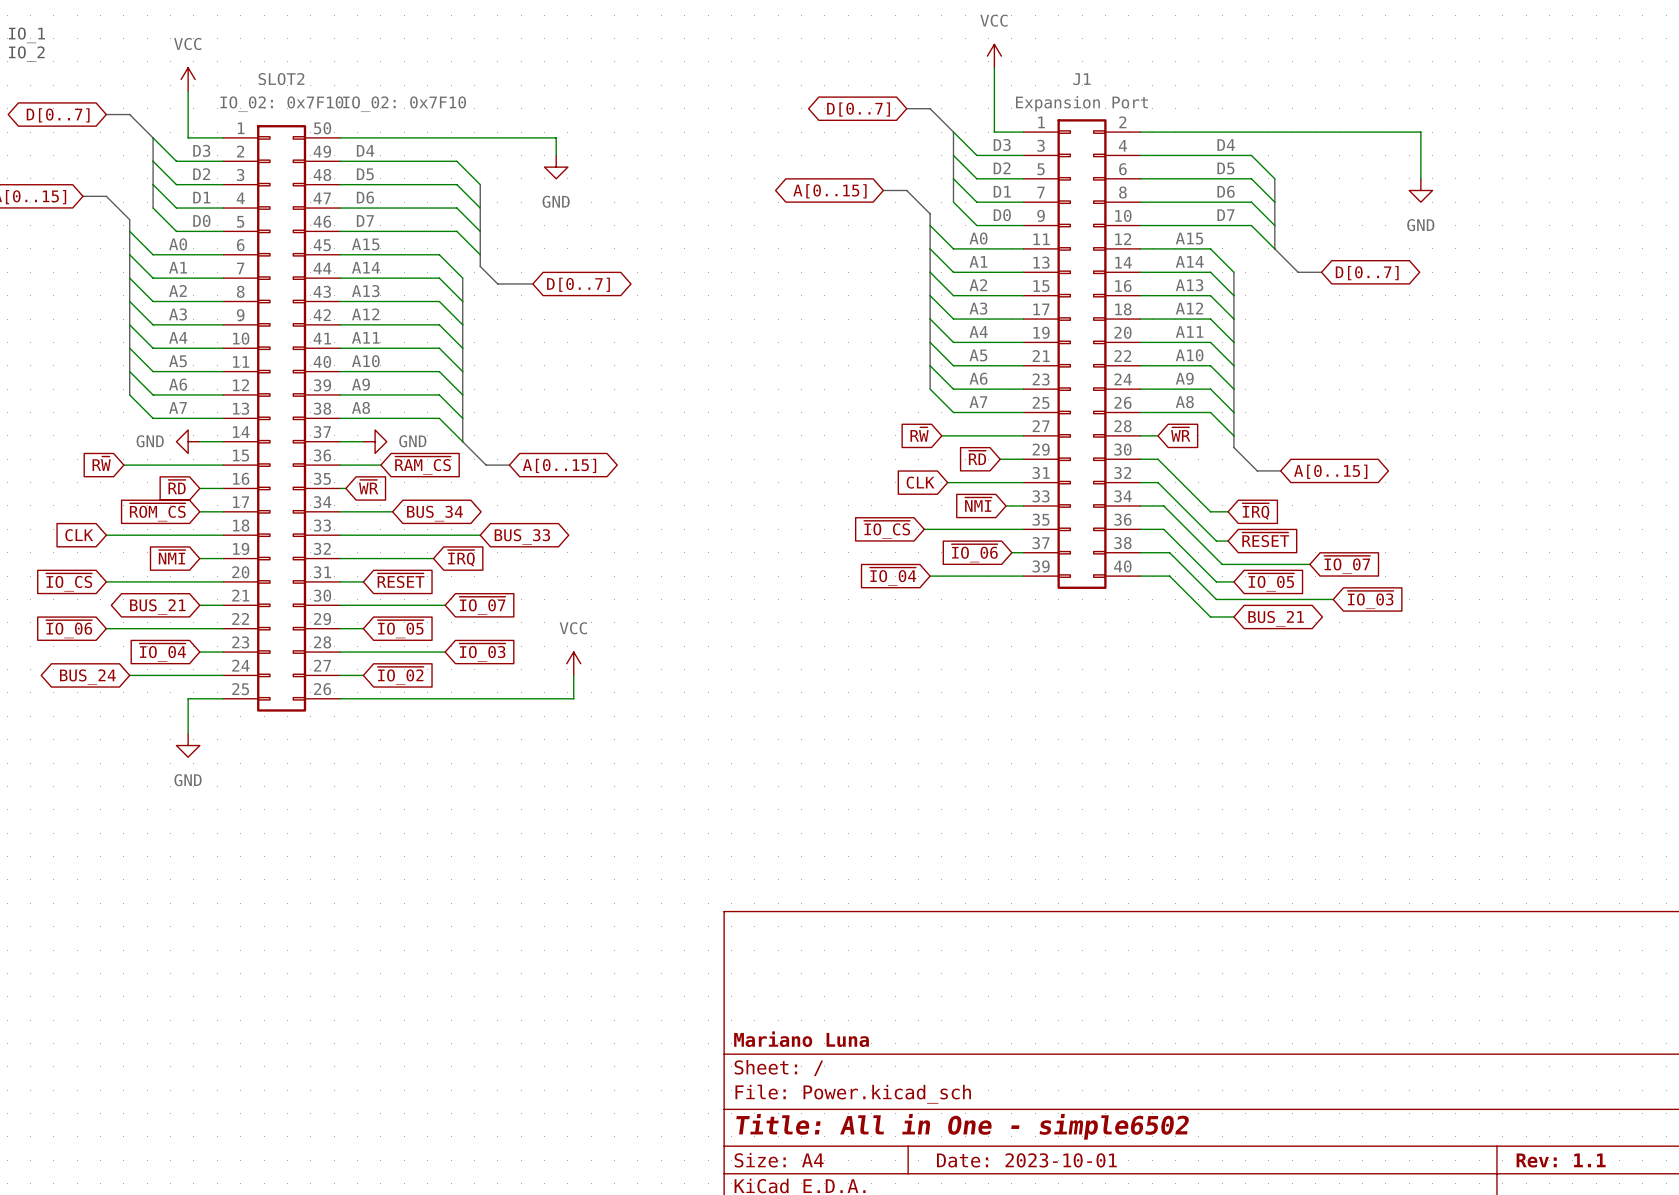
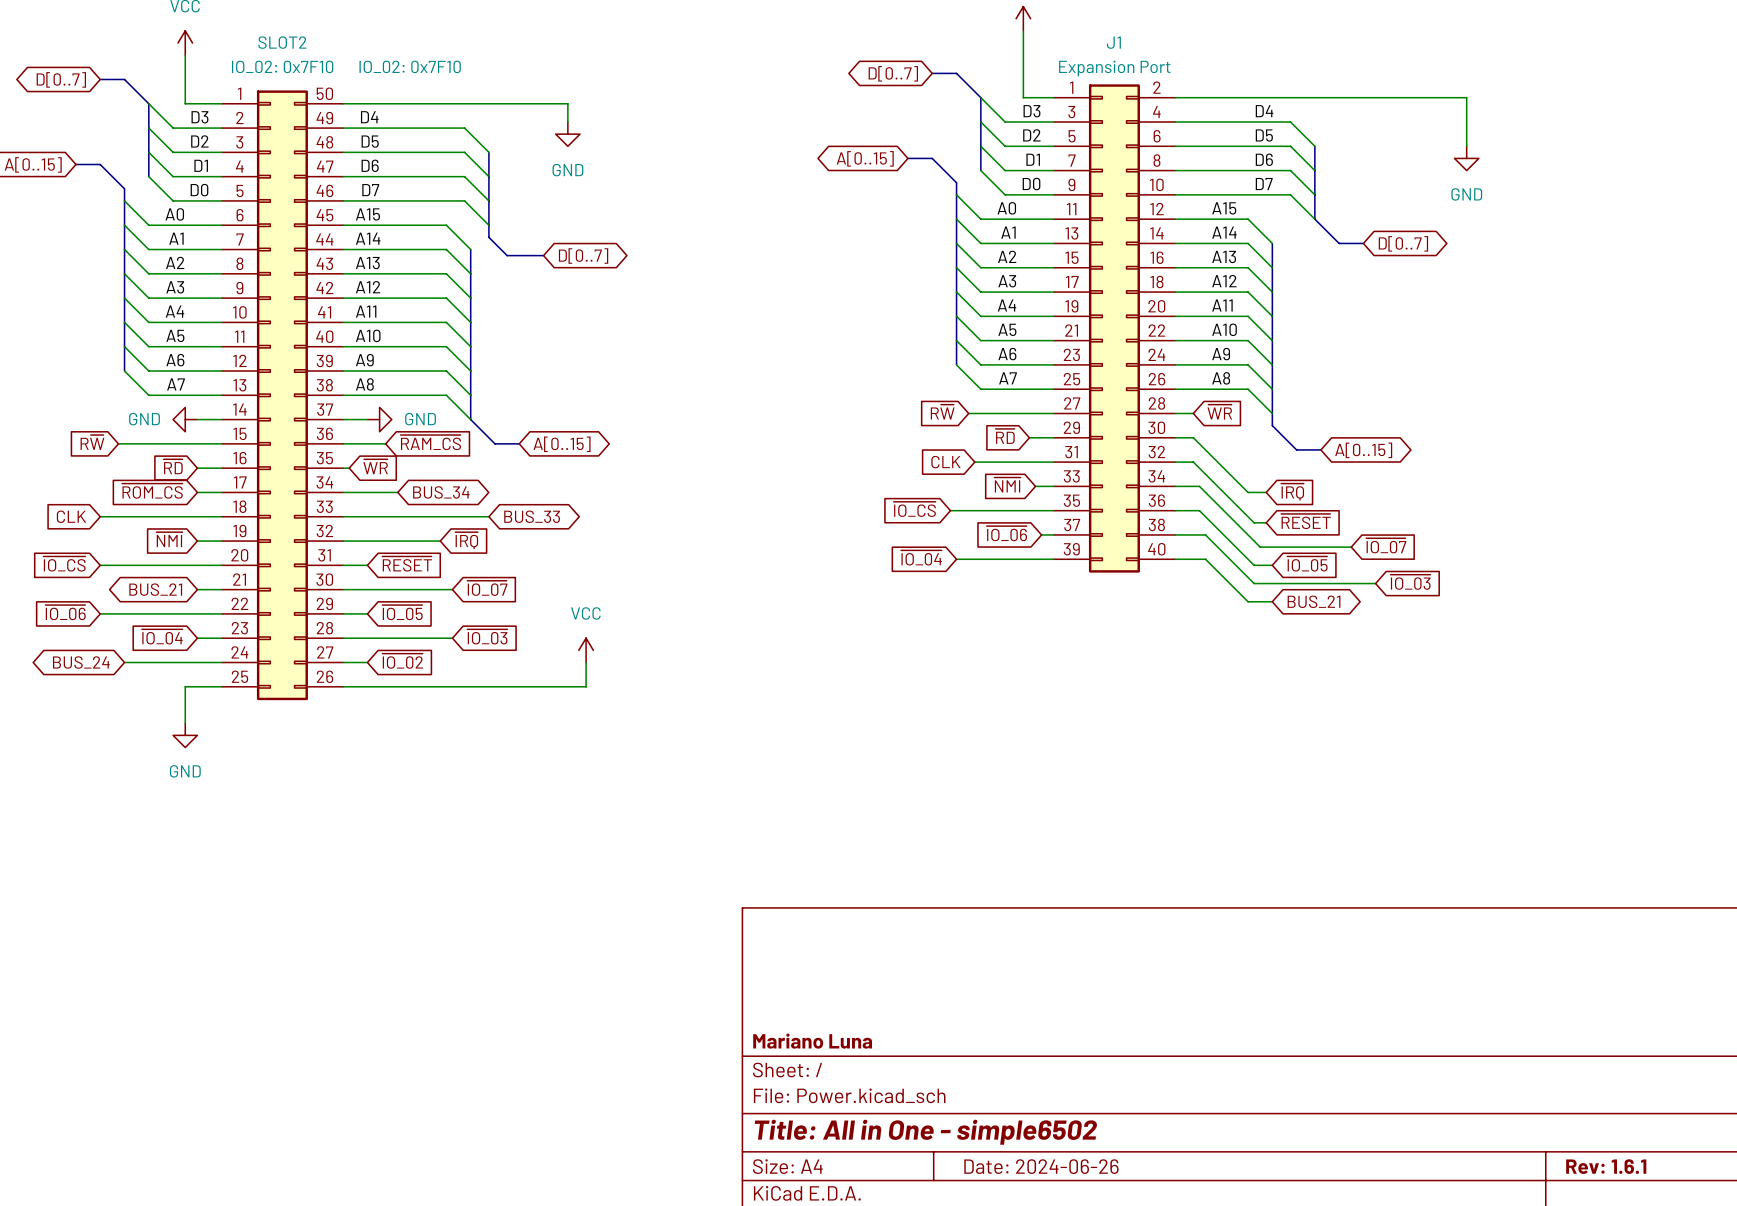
title block: Date: 2023-10-01 (1026, 1160) -> Date: 2024-06-26 (1041, 1166)
title block: Rev: 1.1 (1561, 1160) -> Rev: 1.6.1 (1606, 1166)

